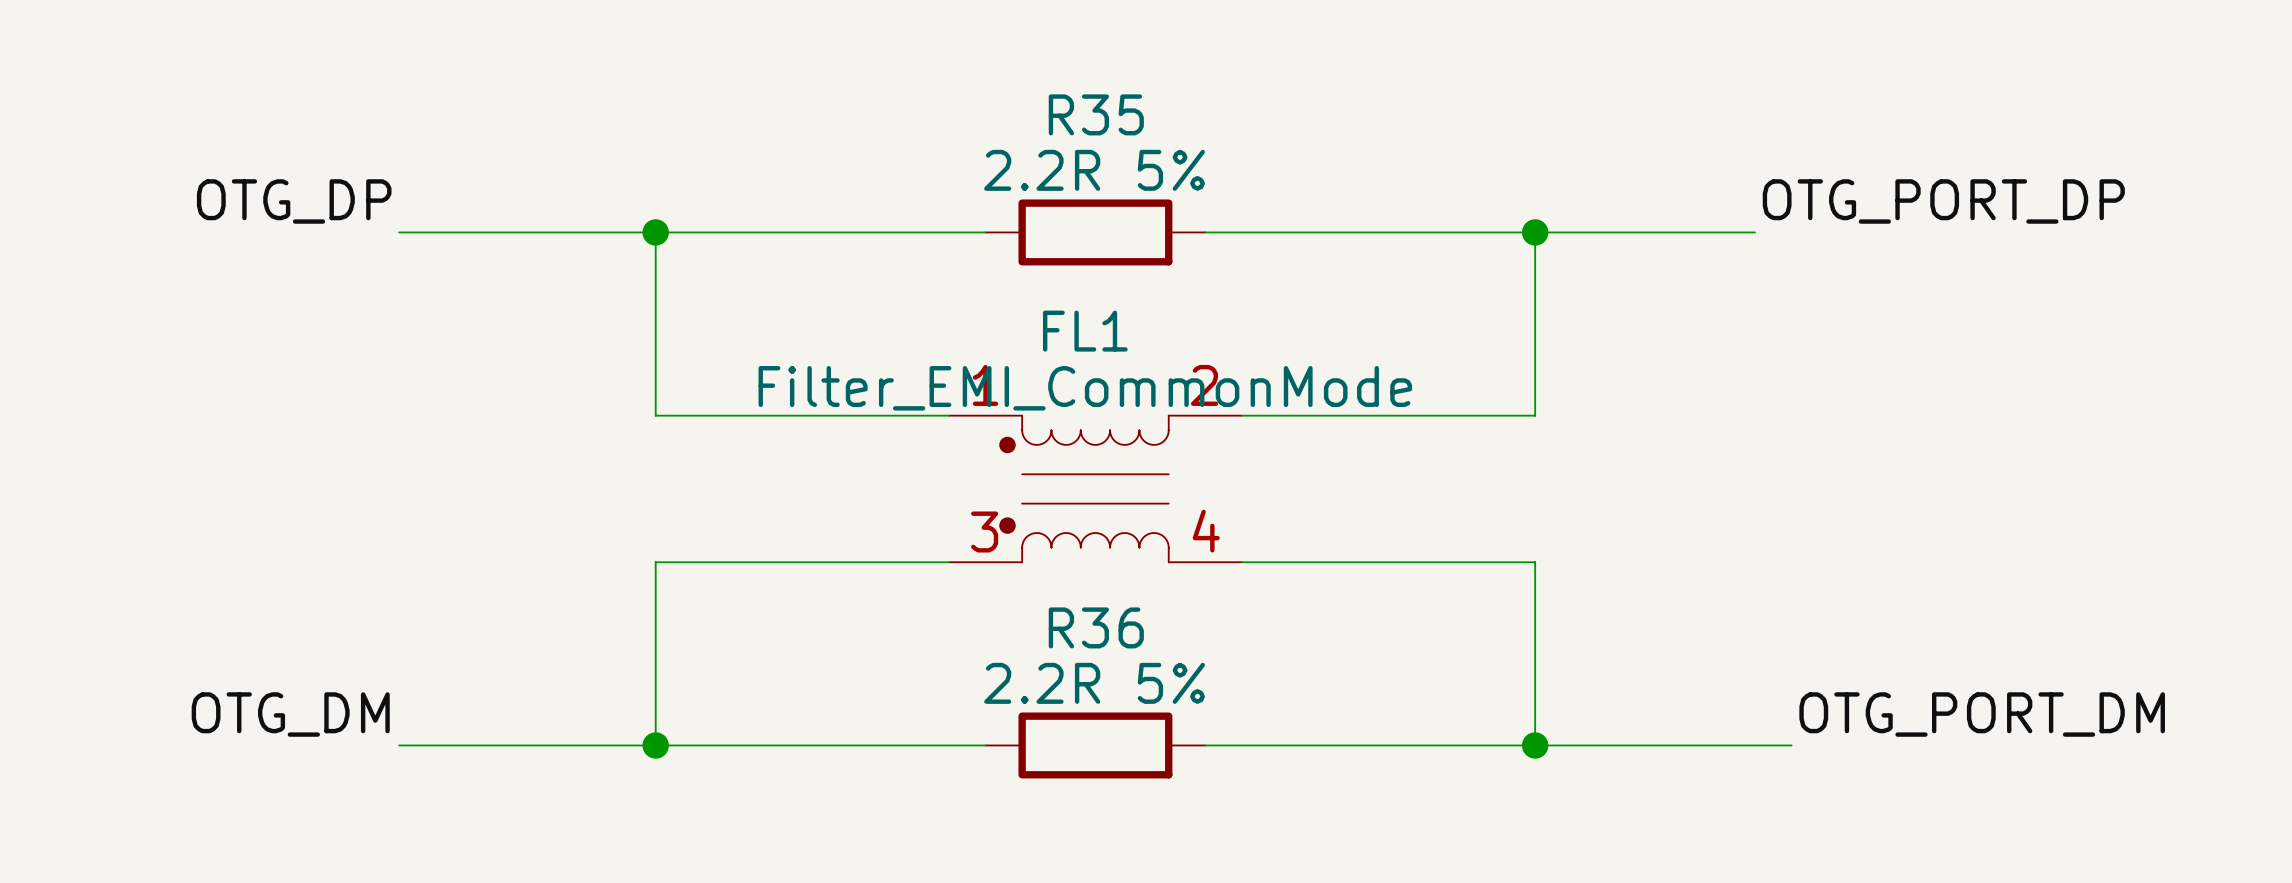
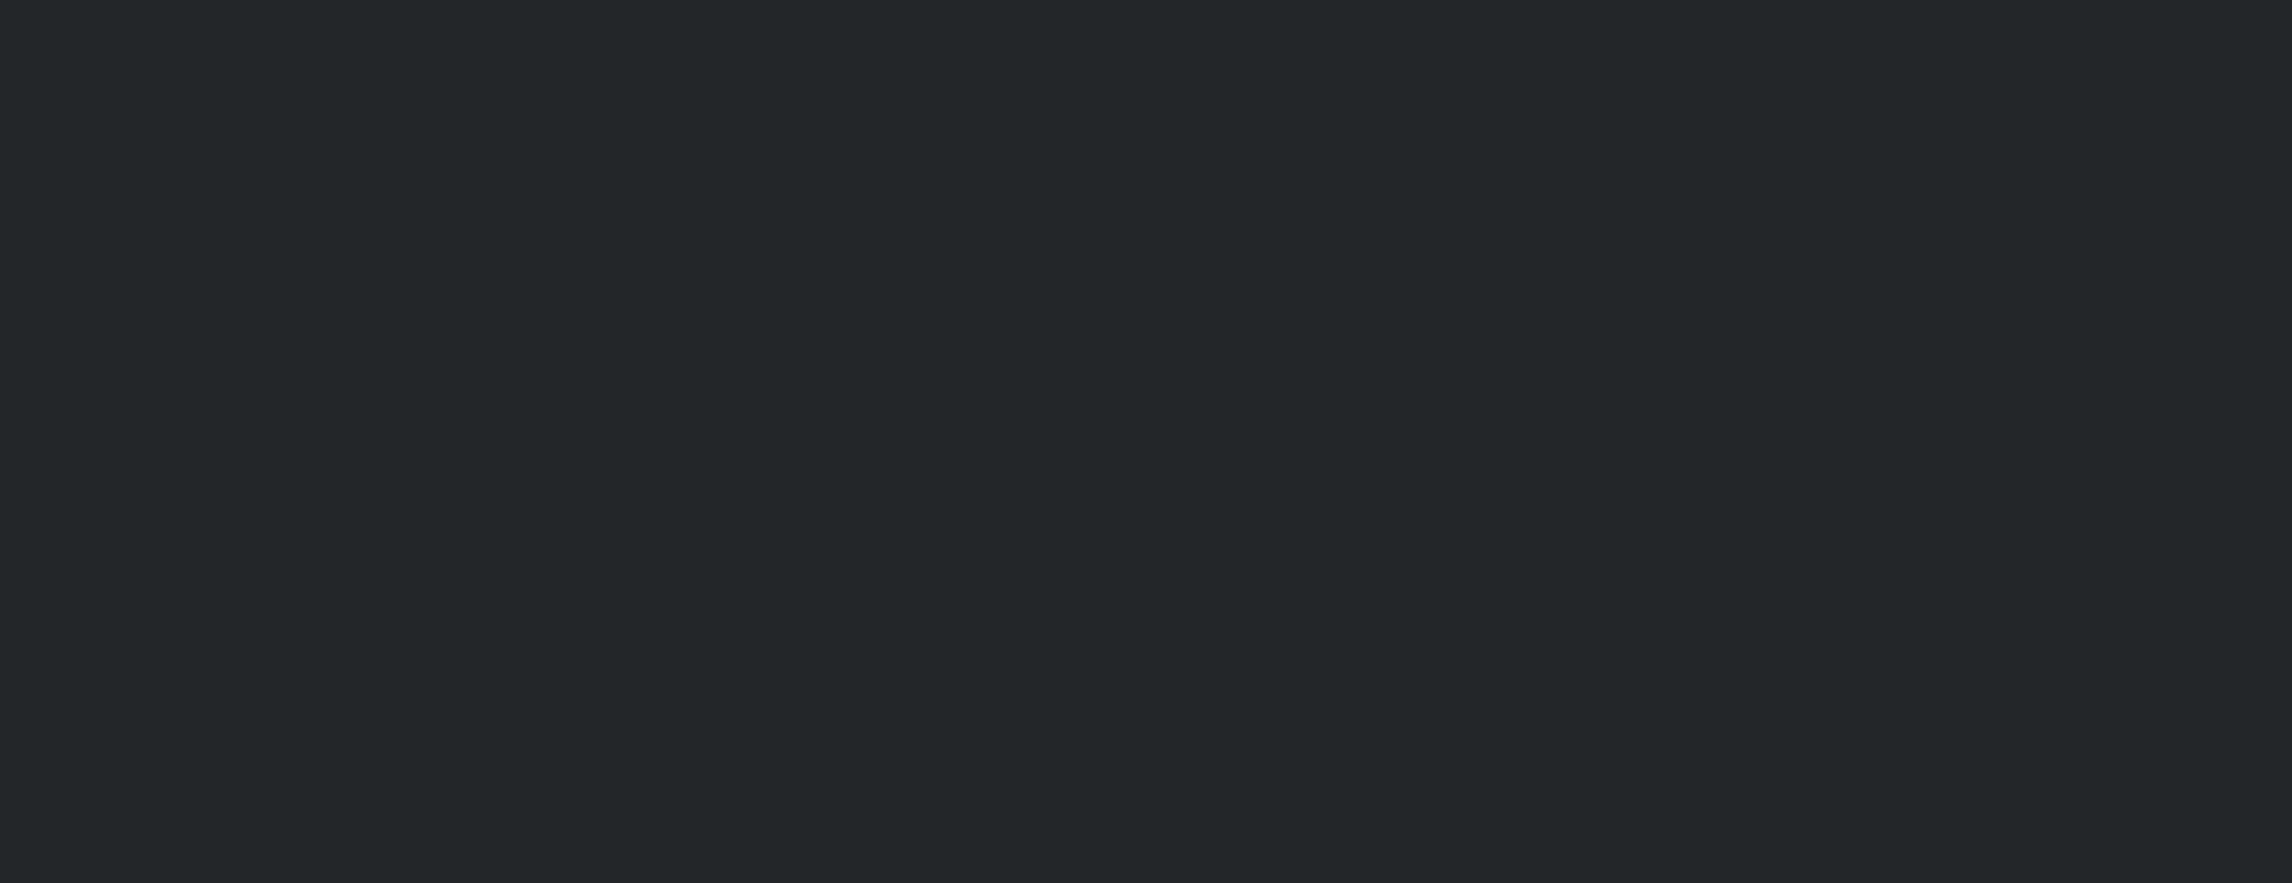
label: OTG_DP (294, 201) -> none
label: OTG_PORT_DP (1943, 201) -> none
wire: (399, 232) (985, 232) -> none
wire: (655, 232) (655, 415) (948, 415) -> none
junction: (655, 232) -> none
R35: 2.2R 5% (1095, 232) -> none
wire: (1205, 232) (1755, 232) -> none
wire: (1535, 232) (1535, 415) (1242, 415) -> none
junction: (1535, 232) -> none
FL1: Filter_EMI_CommonMode (1095, 488) -> none
wire: (948, 562) (655, 562) (655, 745) -> none
wire: (1242, 562) (1535, 562) (1535, 745) -> none
label: OTG_DM (290, 714) -> none
label: OTG_PORT_DM (1982, 714) -> none
wire: (399, 745) (985, 745) -> none
junction: (655, 745) -> none
R36: 2.2R 5% (1095, 745) -> none
wire: (1205, 745) (1791, 745) -> none
junction: (1535, 745) -> none

